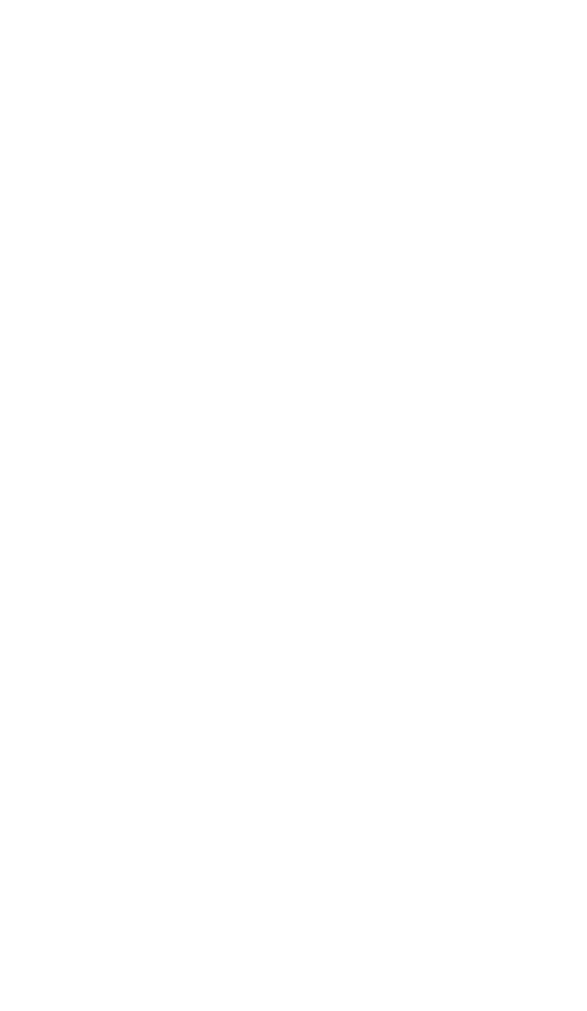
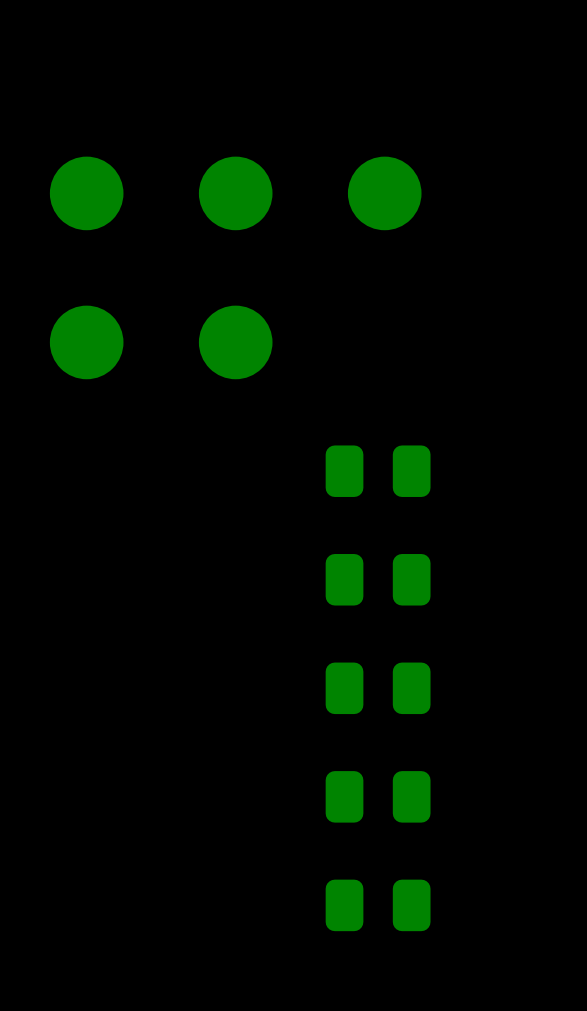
part: none -> (86, 193)
part: none -> (235, 193)
part: none -> (384, 193)
part: none -> (86, 342)
part: none -> (235, 342)
part: none -> (378, 471)
part: none -> (378, 579)
part: none -> (378, 688)
part: none -> (378, 796)
part: none -> (378, 905)

